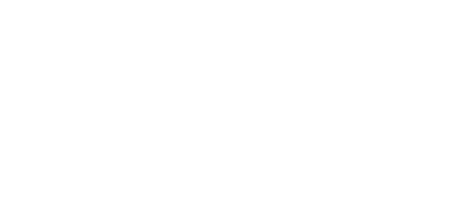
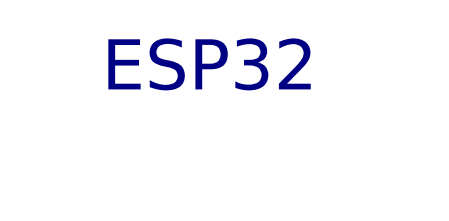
text: none -> ESP32 (209, 64)

